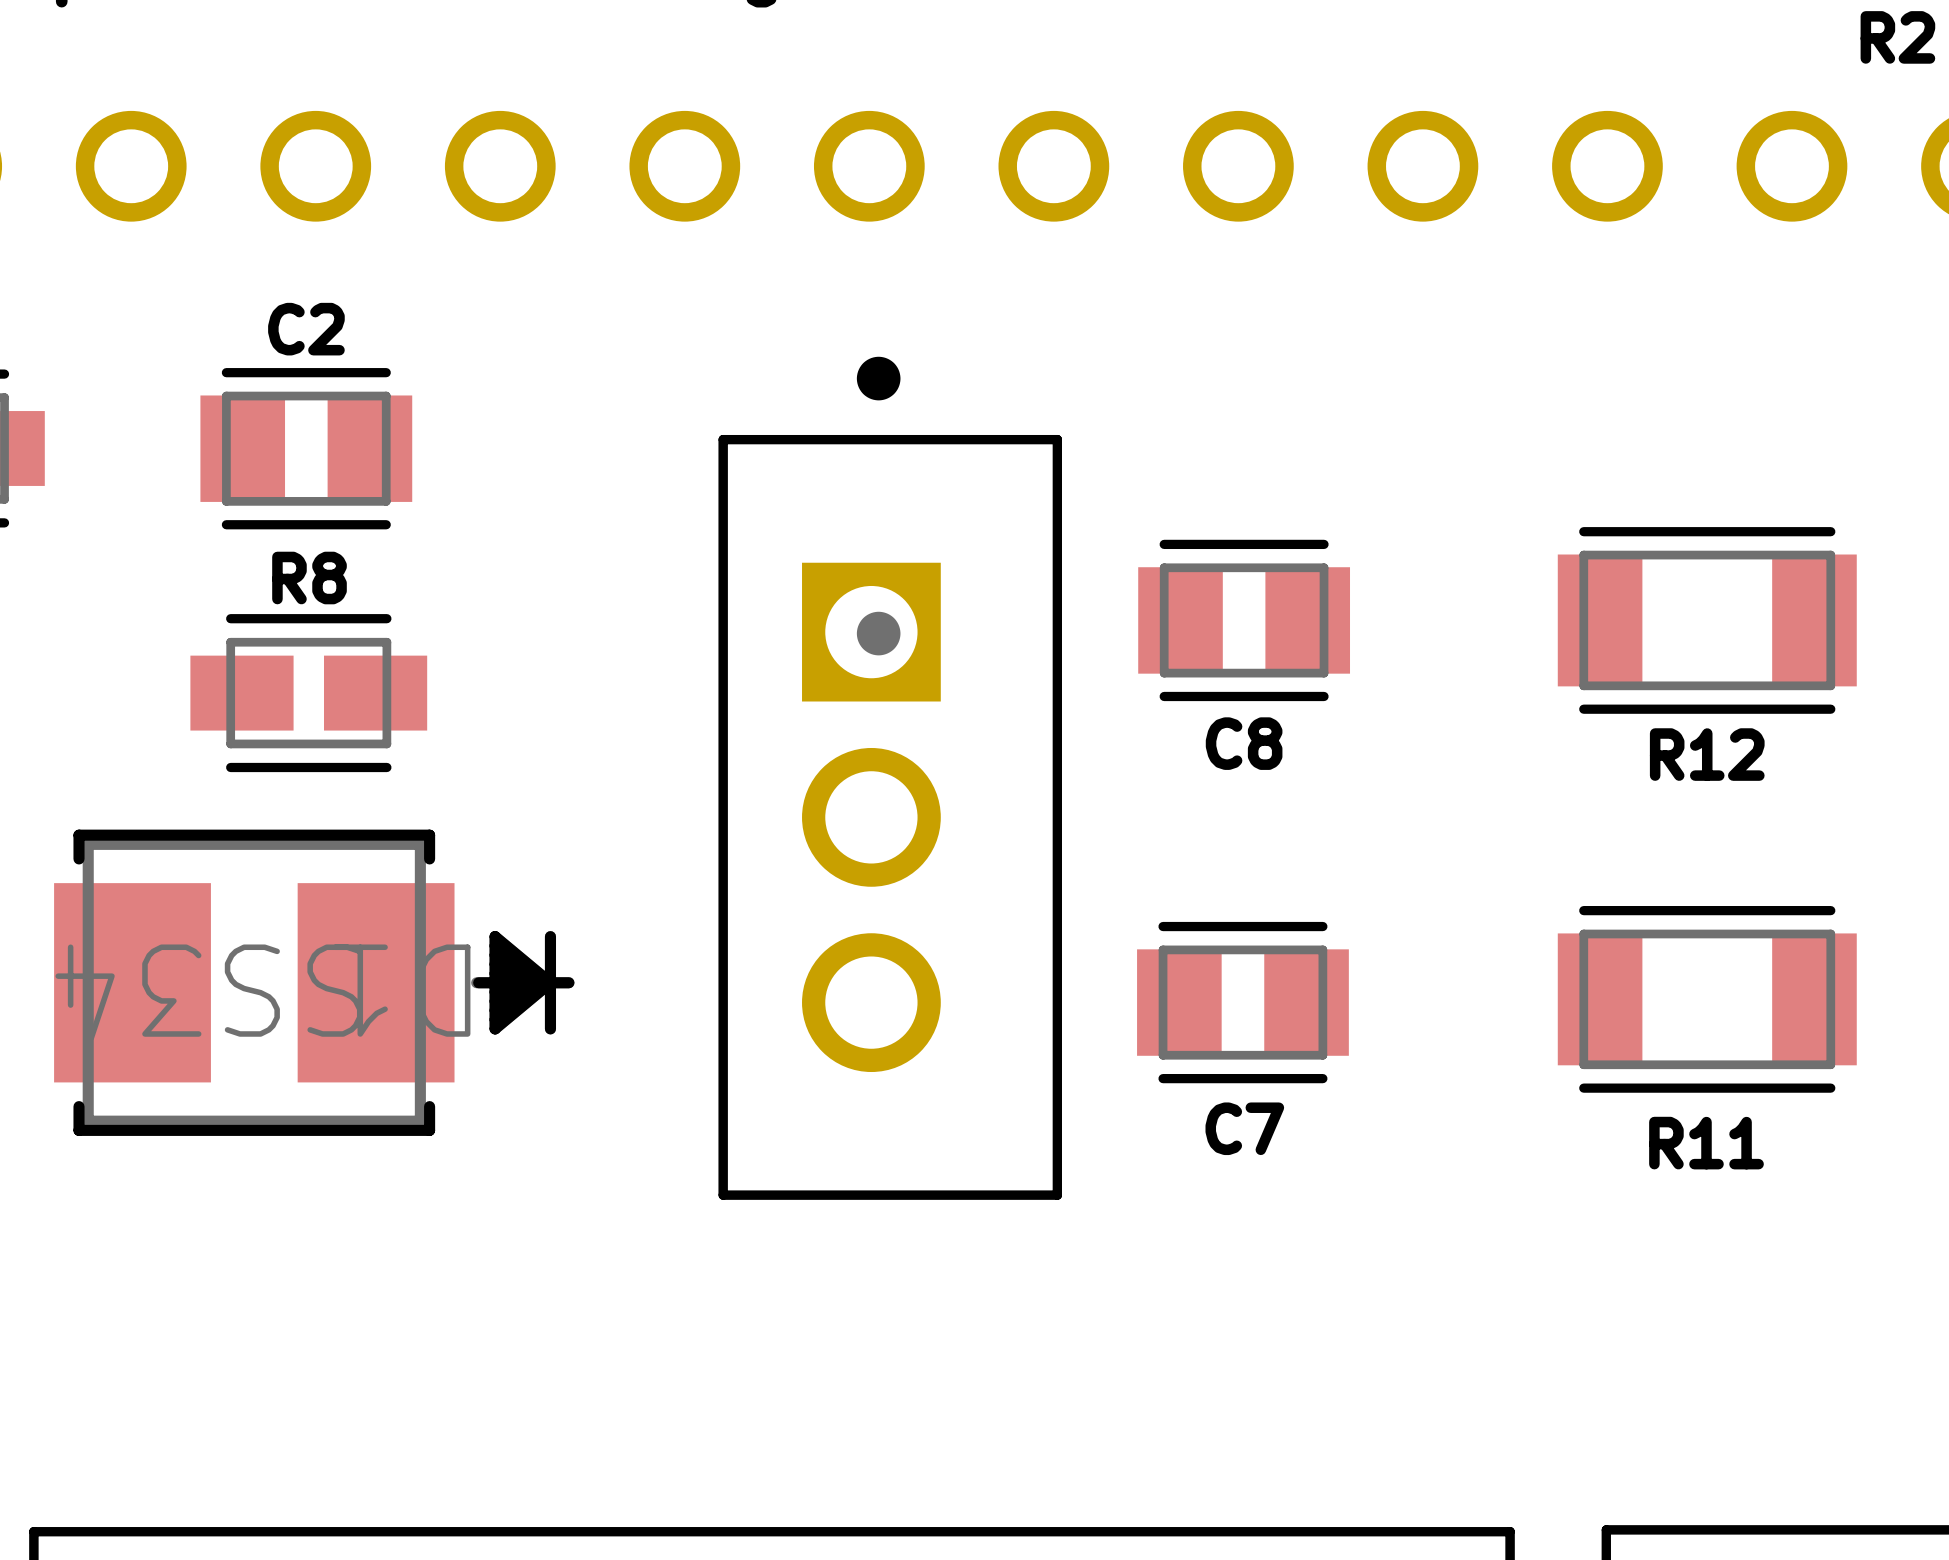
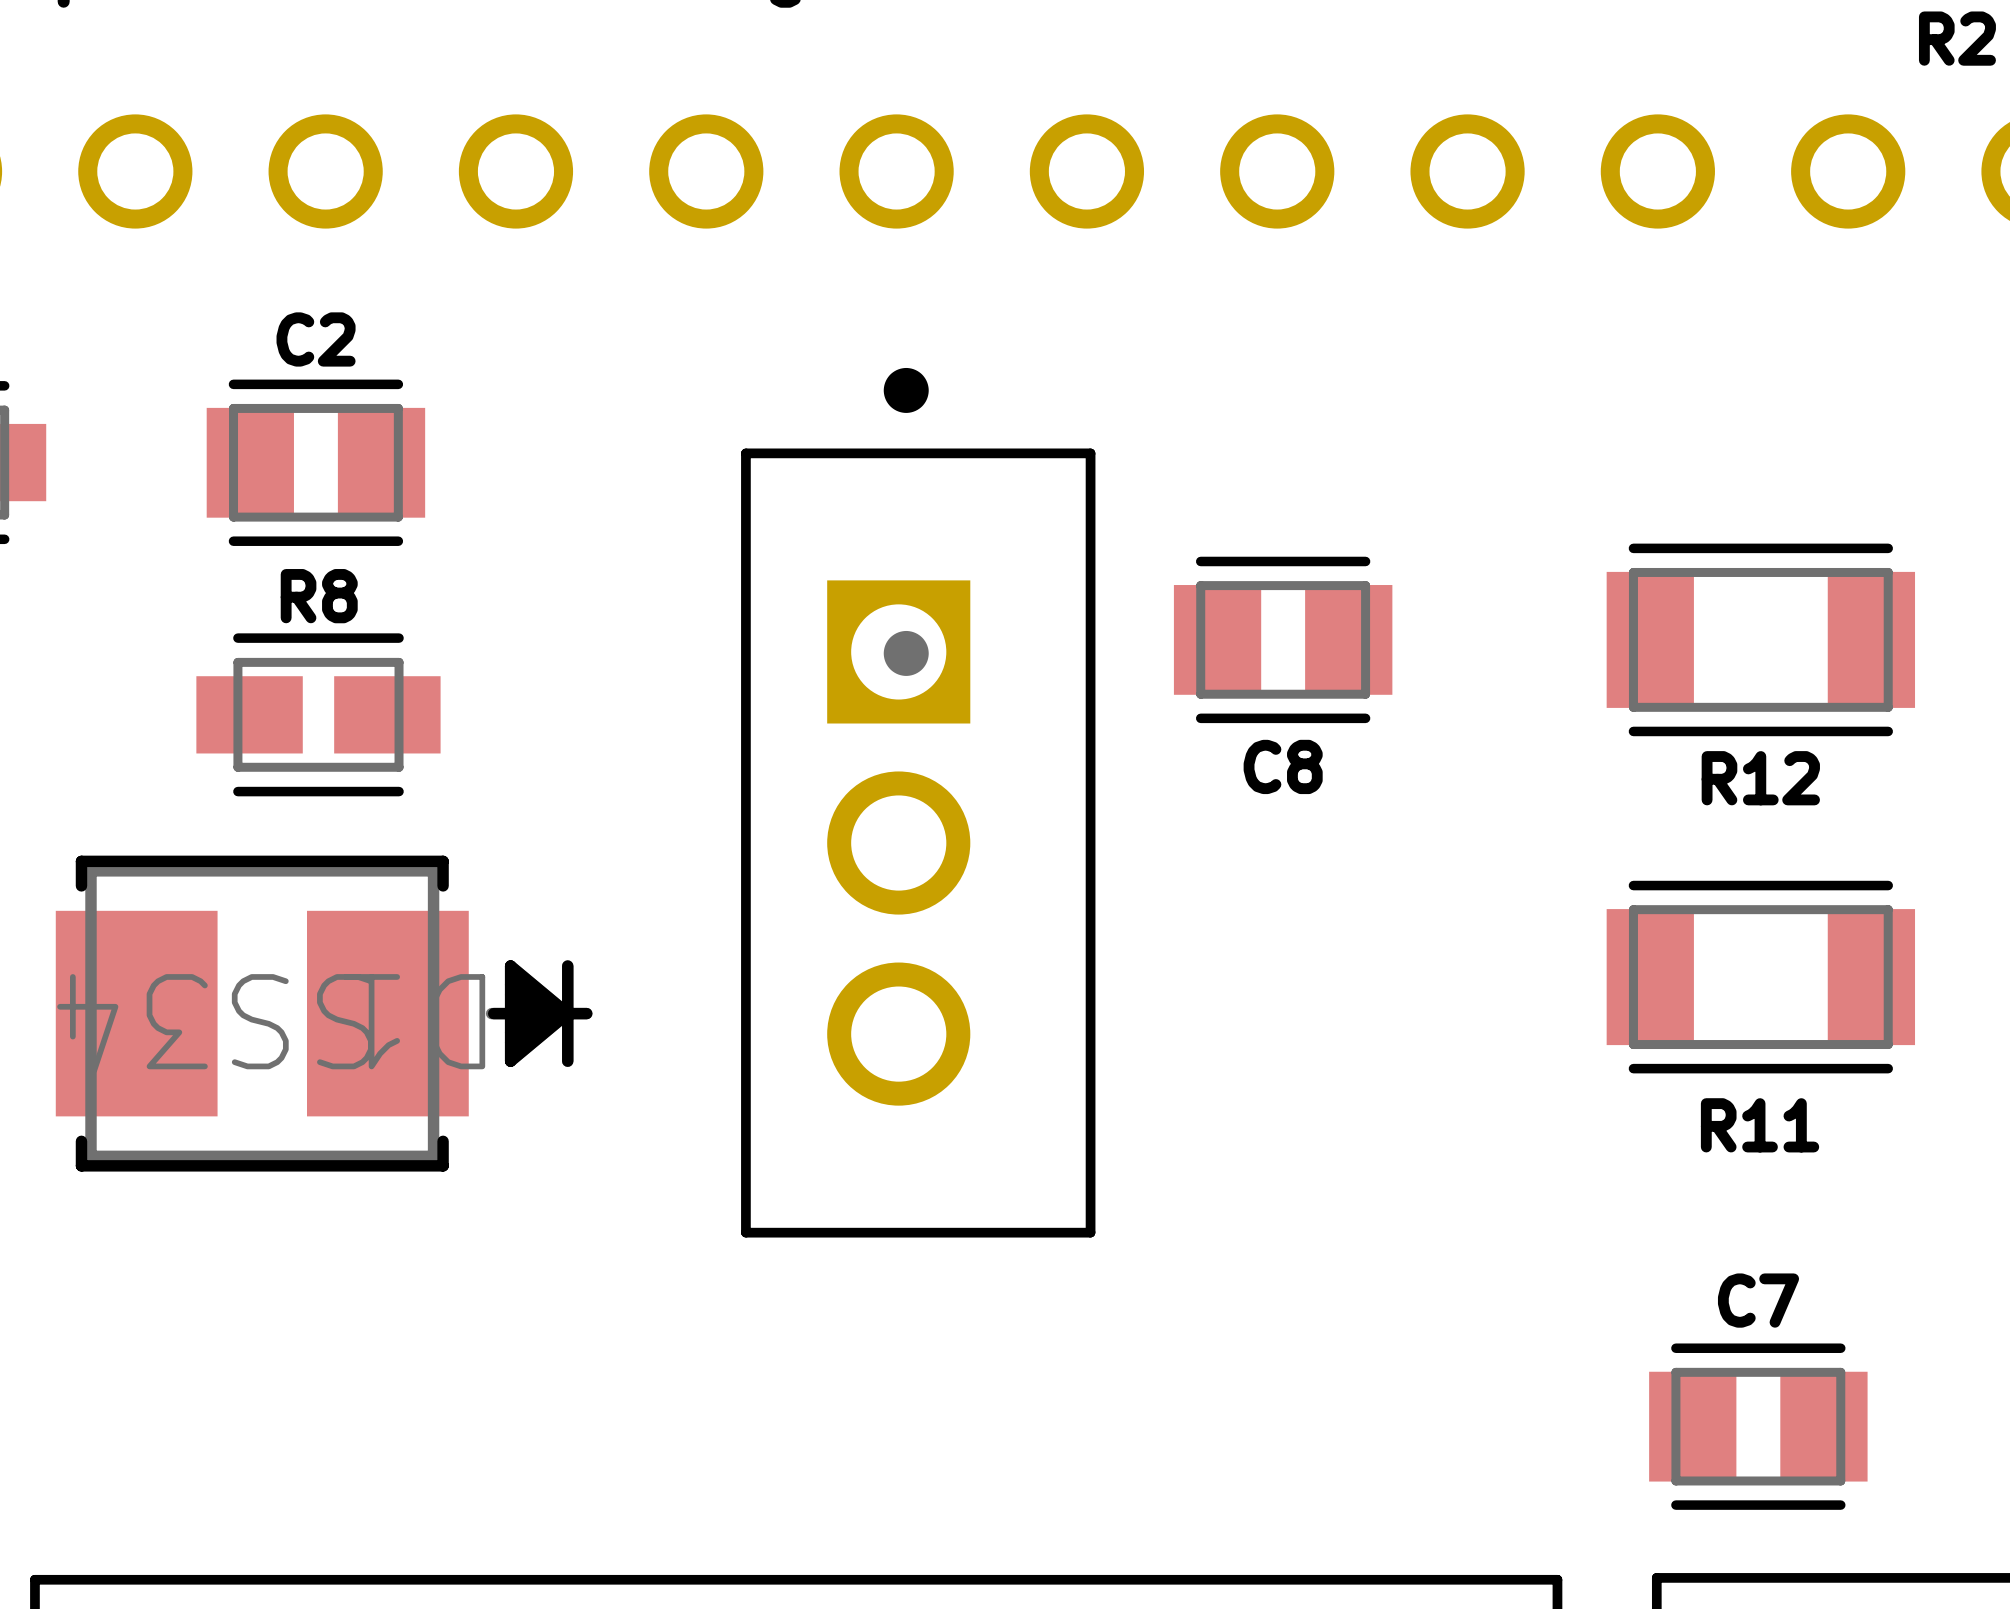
R11 position: (1707, 999) -> (1760, 977)
C7 position: (1242, 1002) -> (1758, 1426)
C7 name position: C7 (1244, 1128) -> C7 (1758, 1300)

